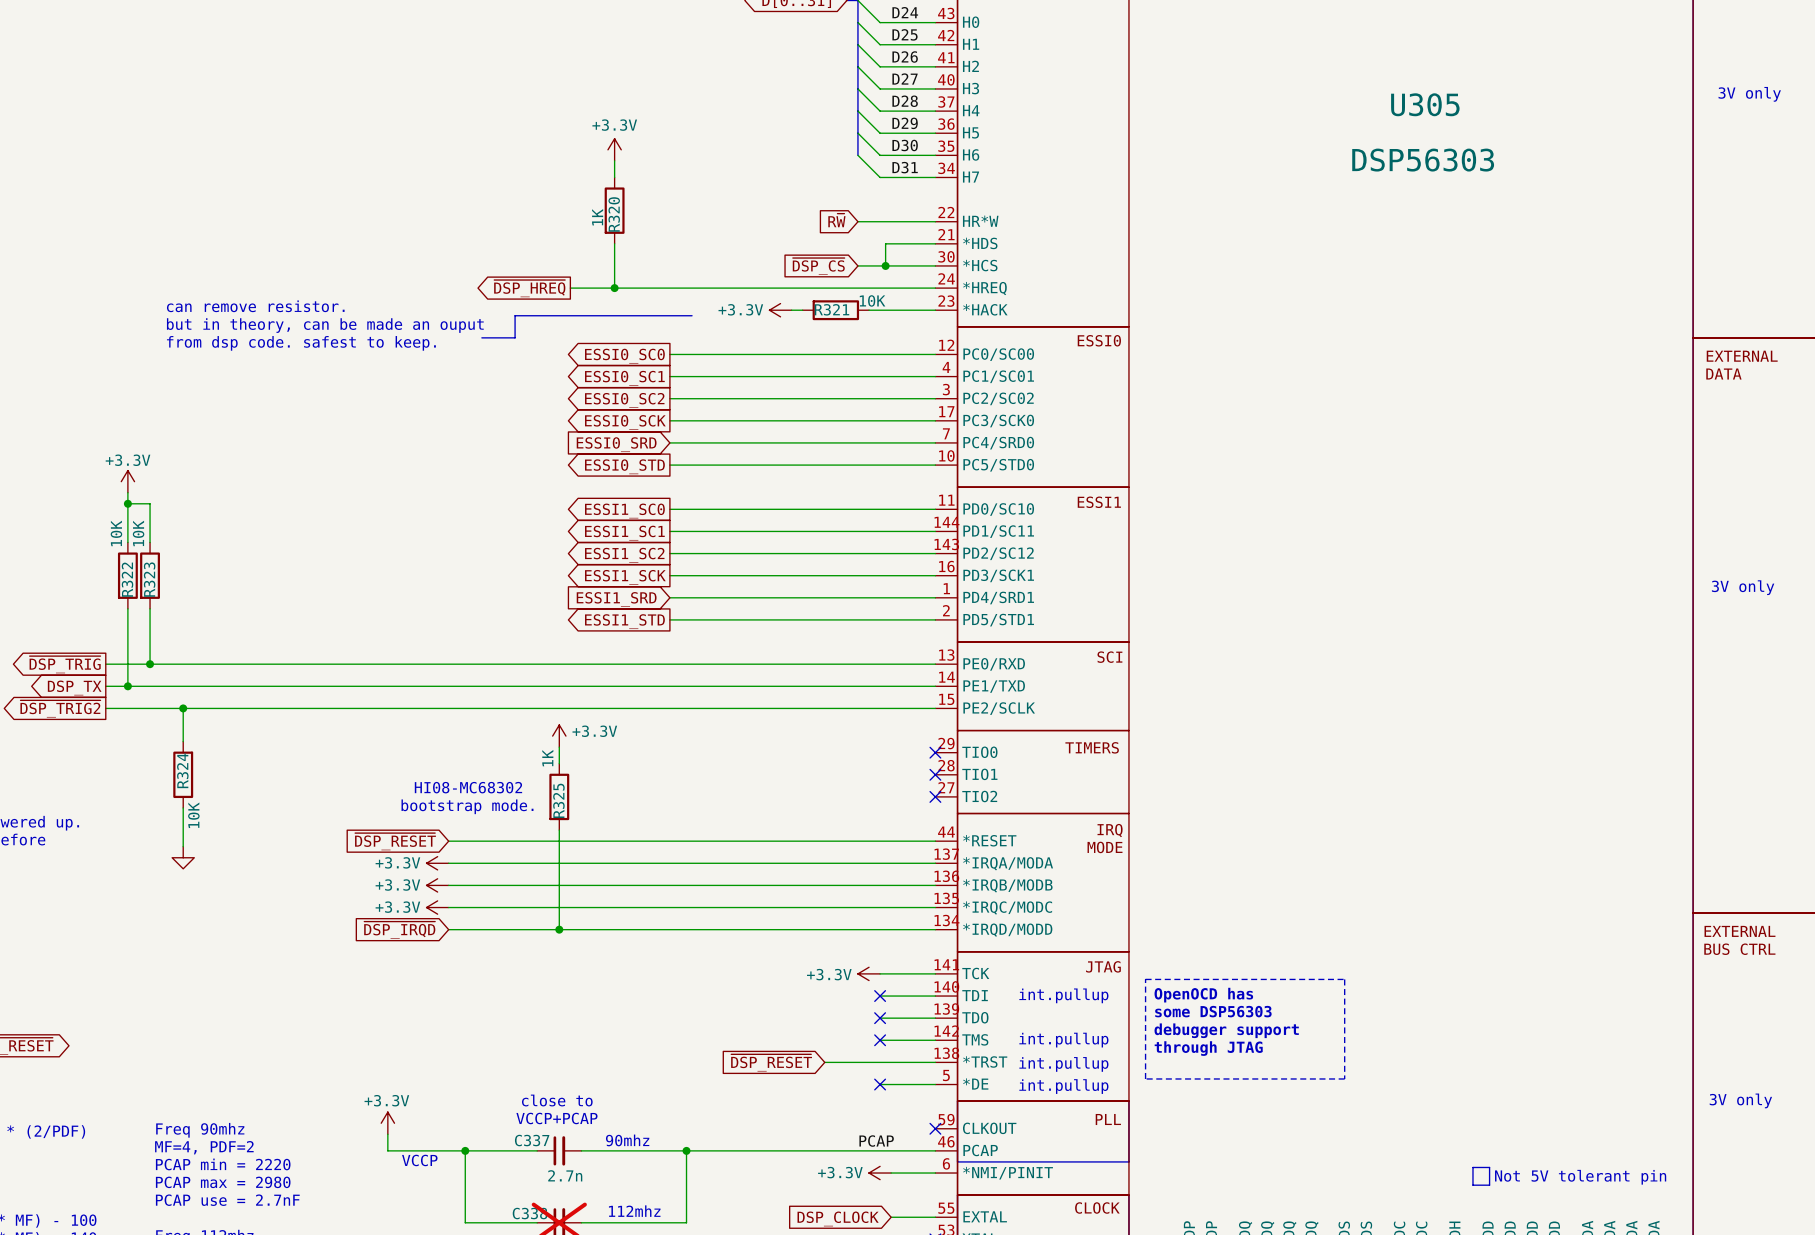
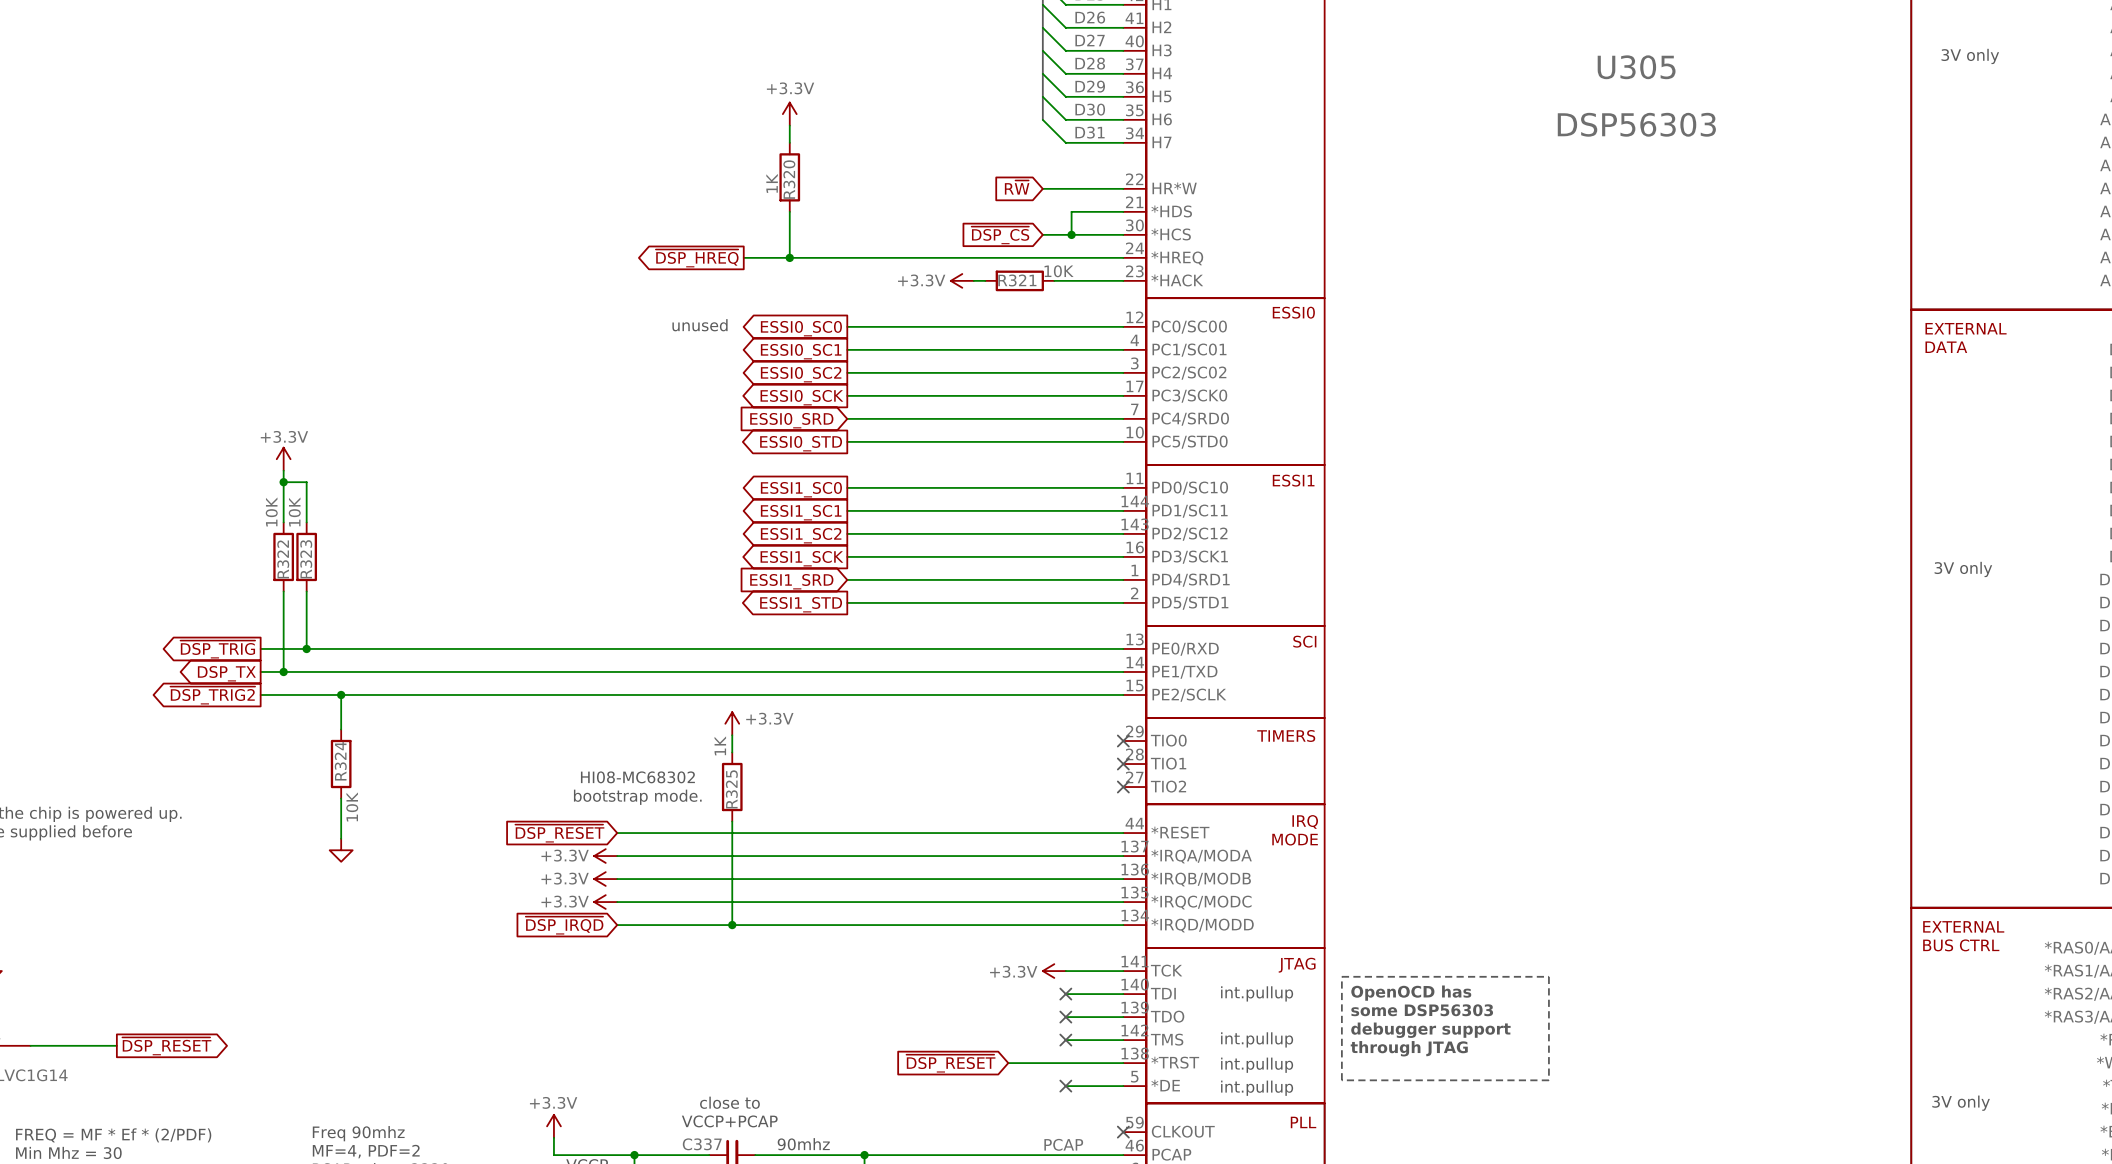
text: can remove resistor. (255, 306) -> none
line: (692, 315) (515, 315) (515, 337) (481, 337) -> none
text: but in theory, can be made an ouput (325, 325) -> none
text: from dsp code. safest to keep. (301, 343) -> none
text: none -> unused (700, 325)

